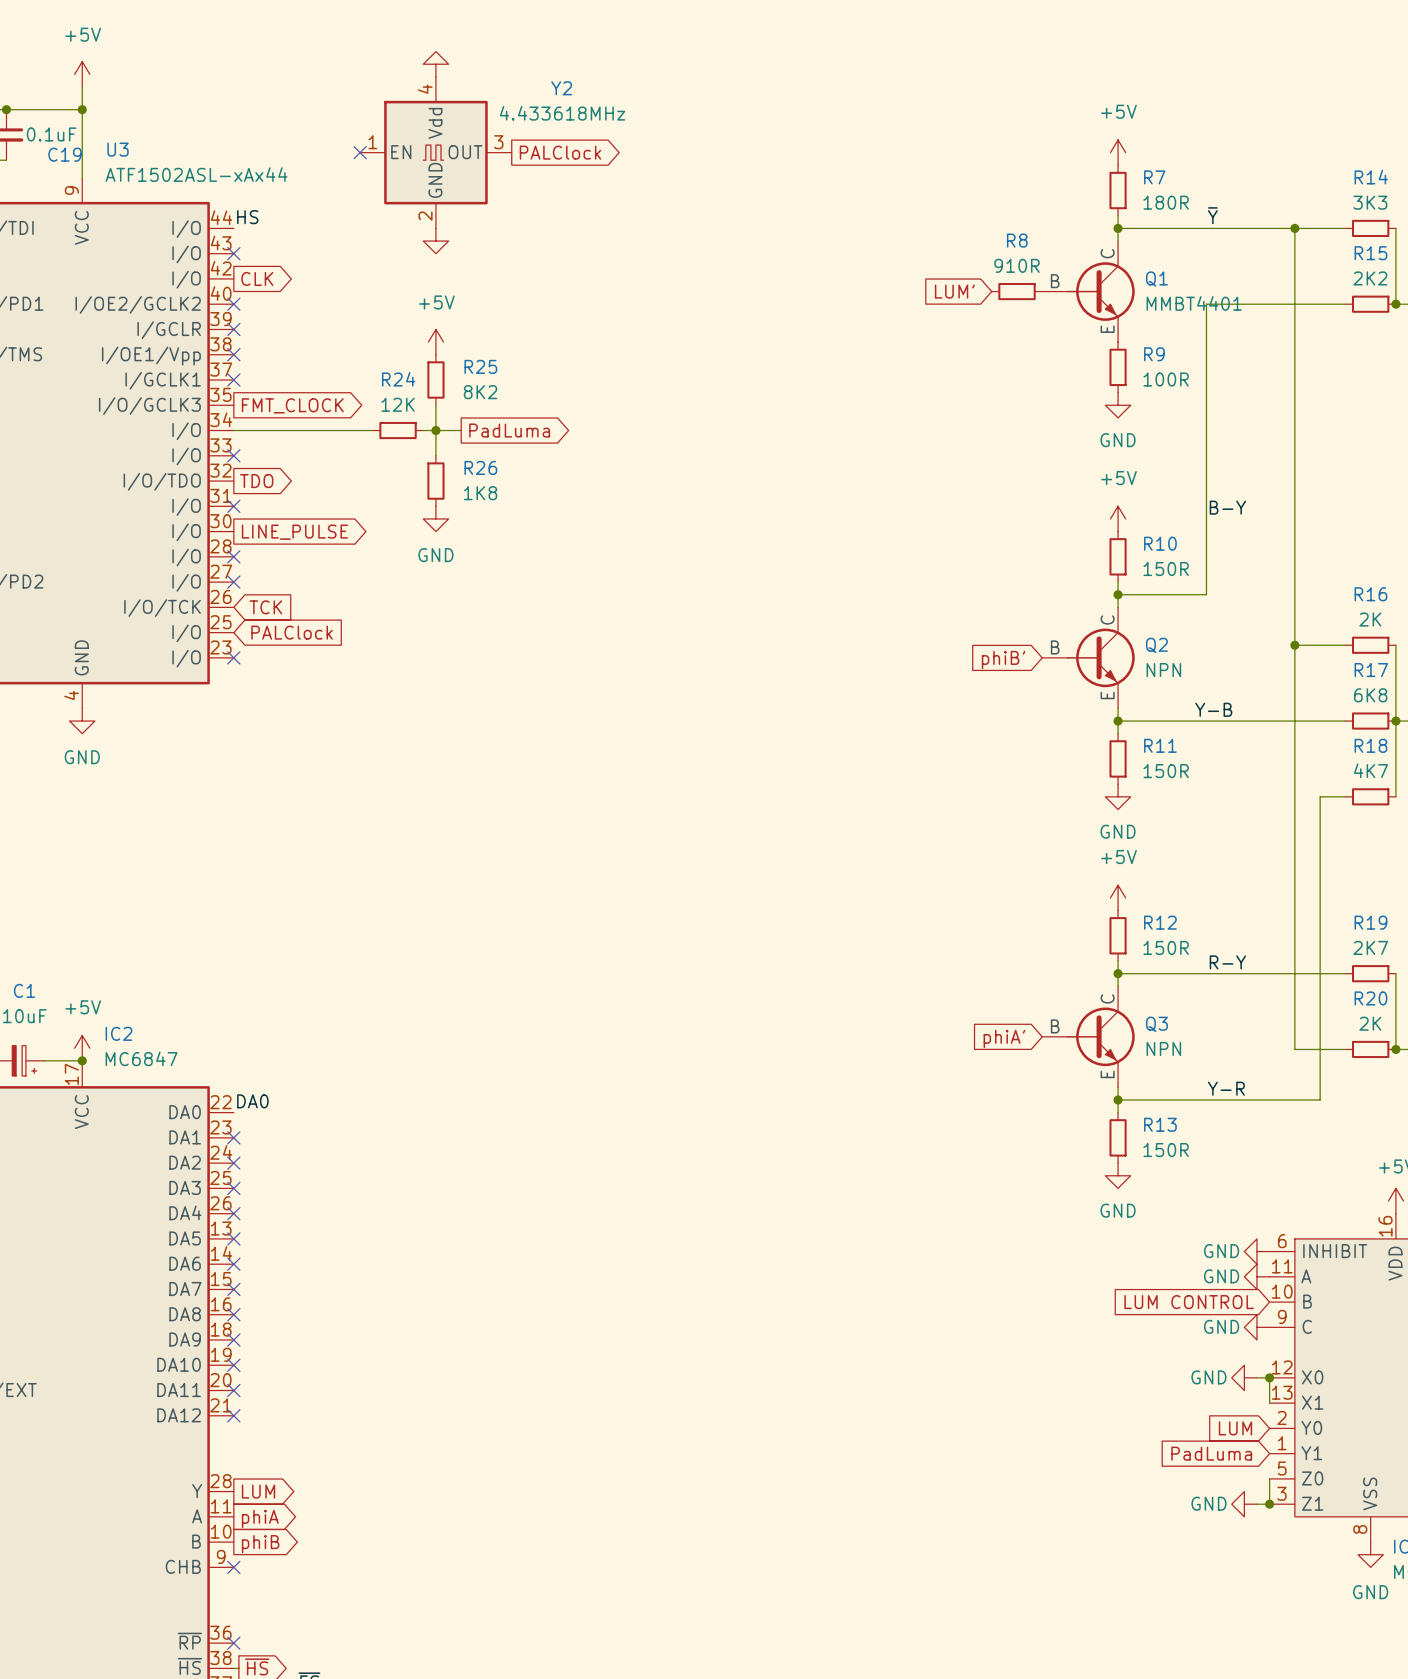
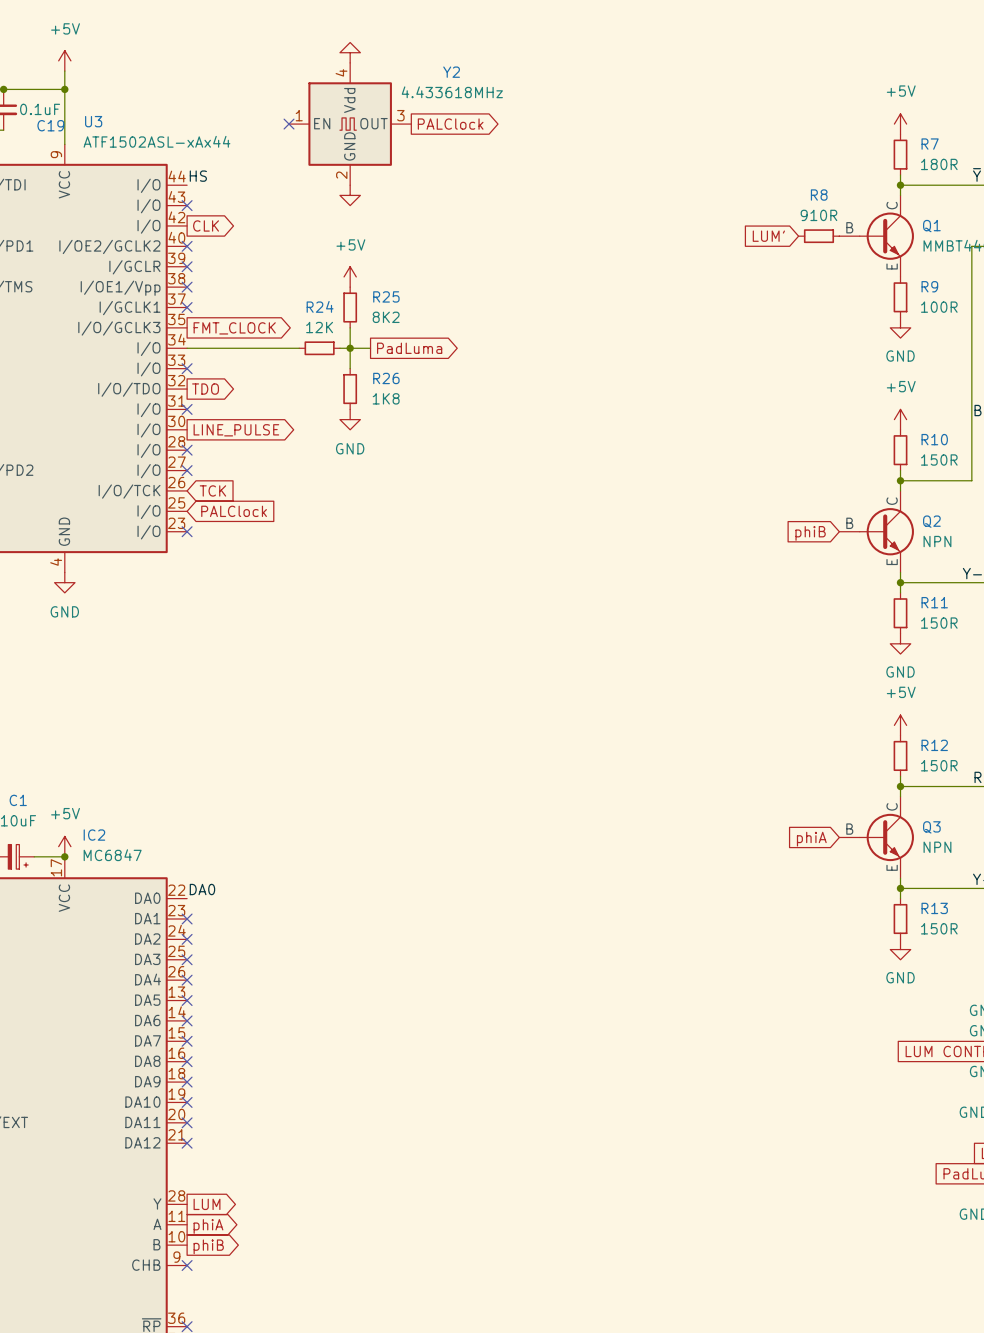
global label: phiB' (1003, 659) -> phiB (810, 533)
global label: phiA' (1004, 1038) -> phiA (811, 839)

